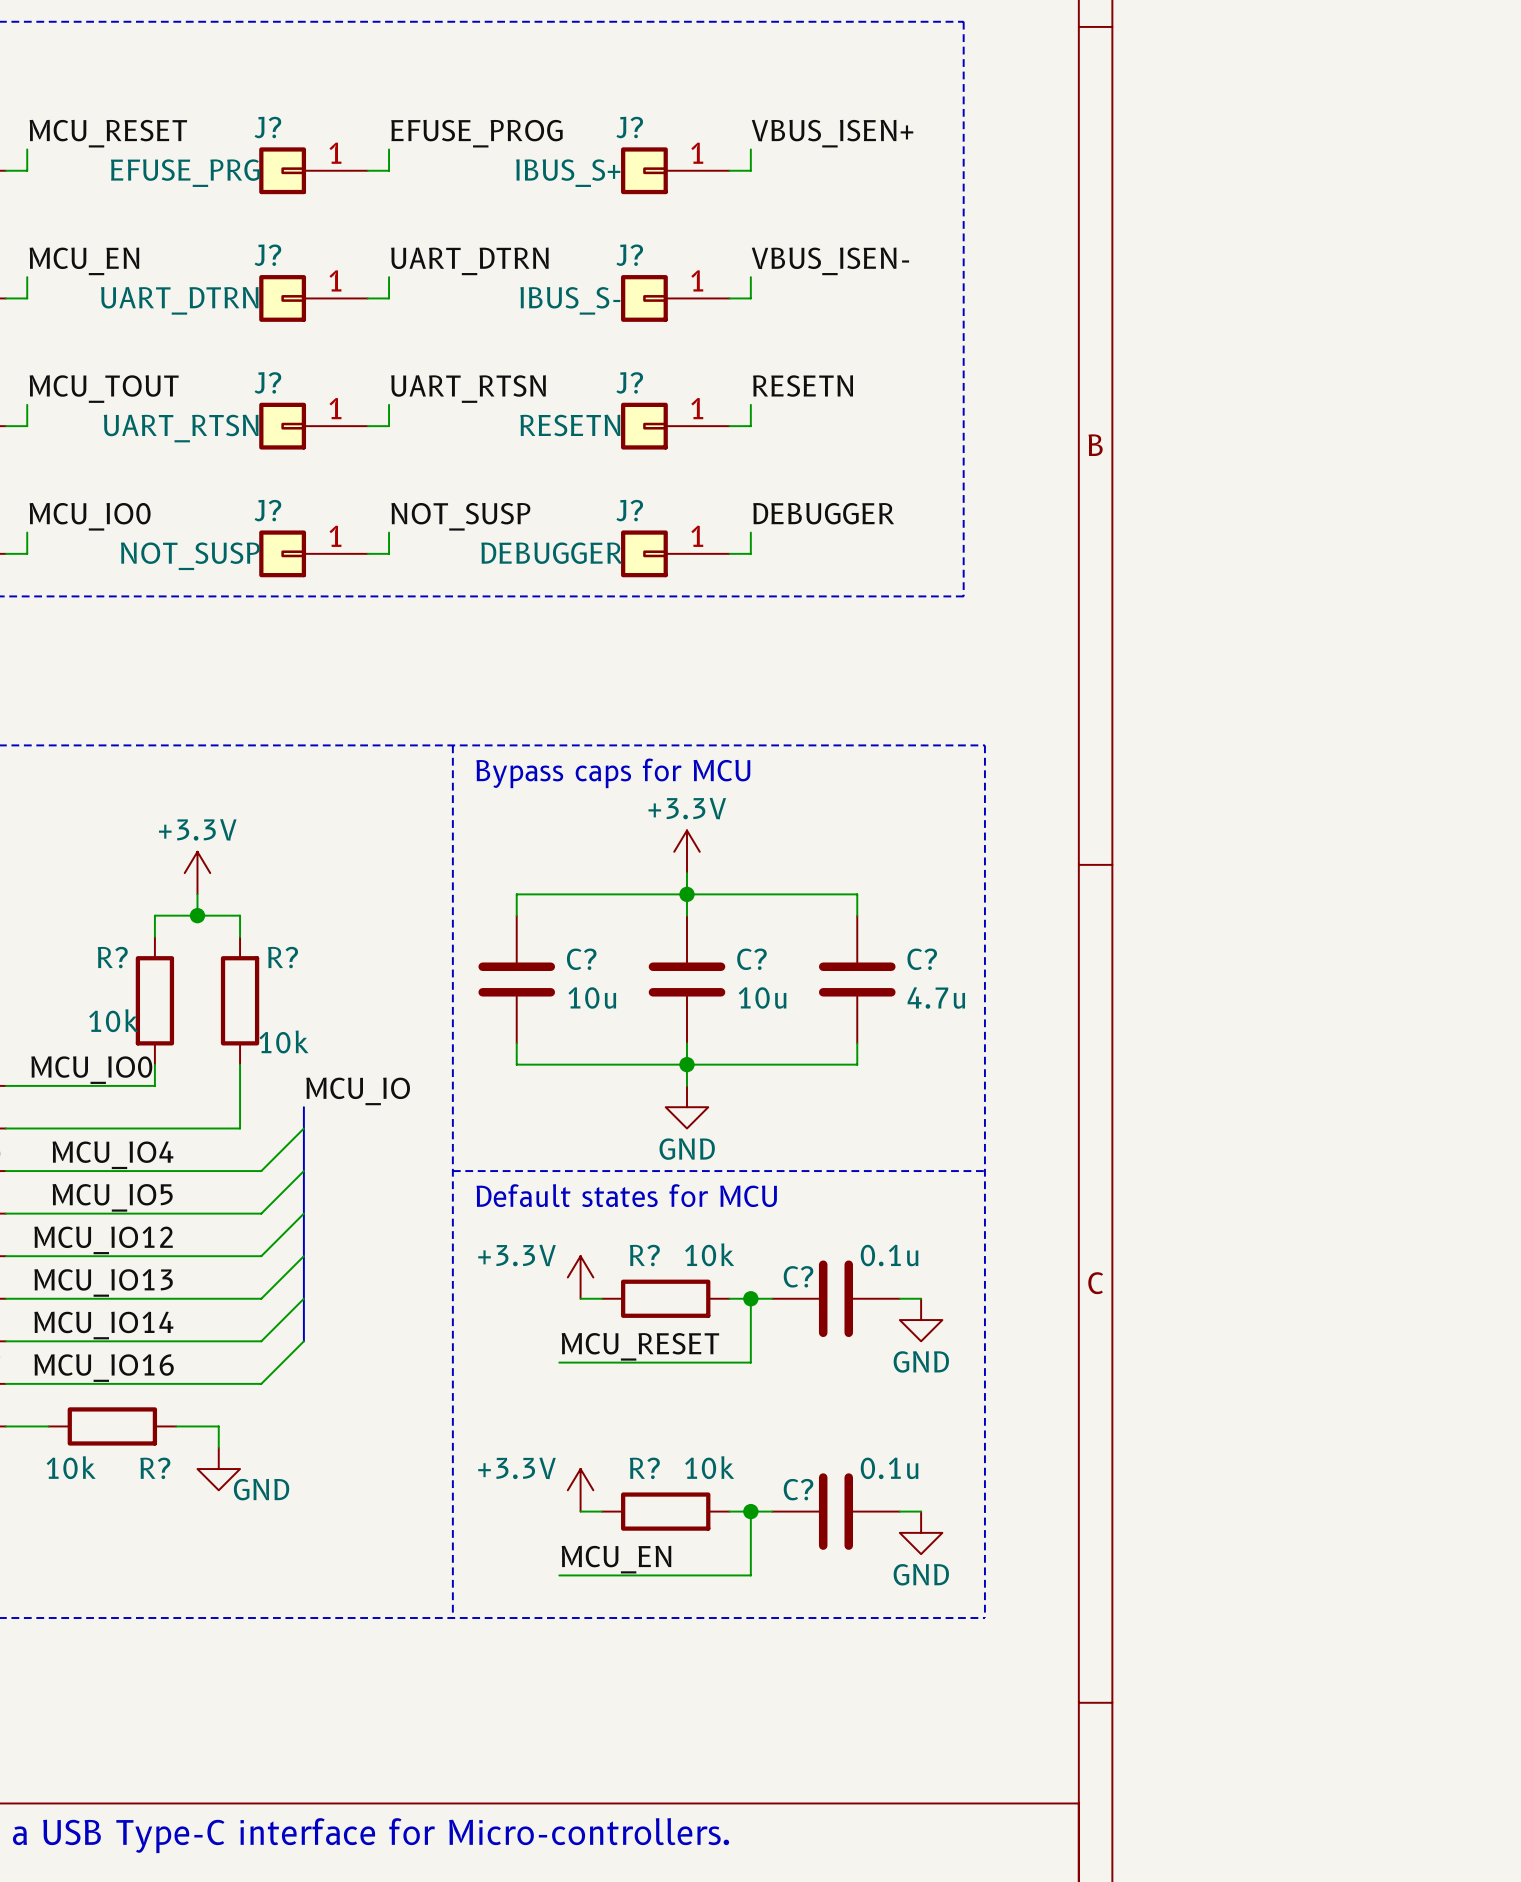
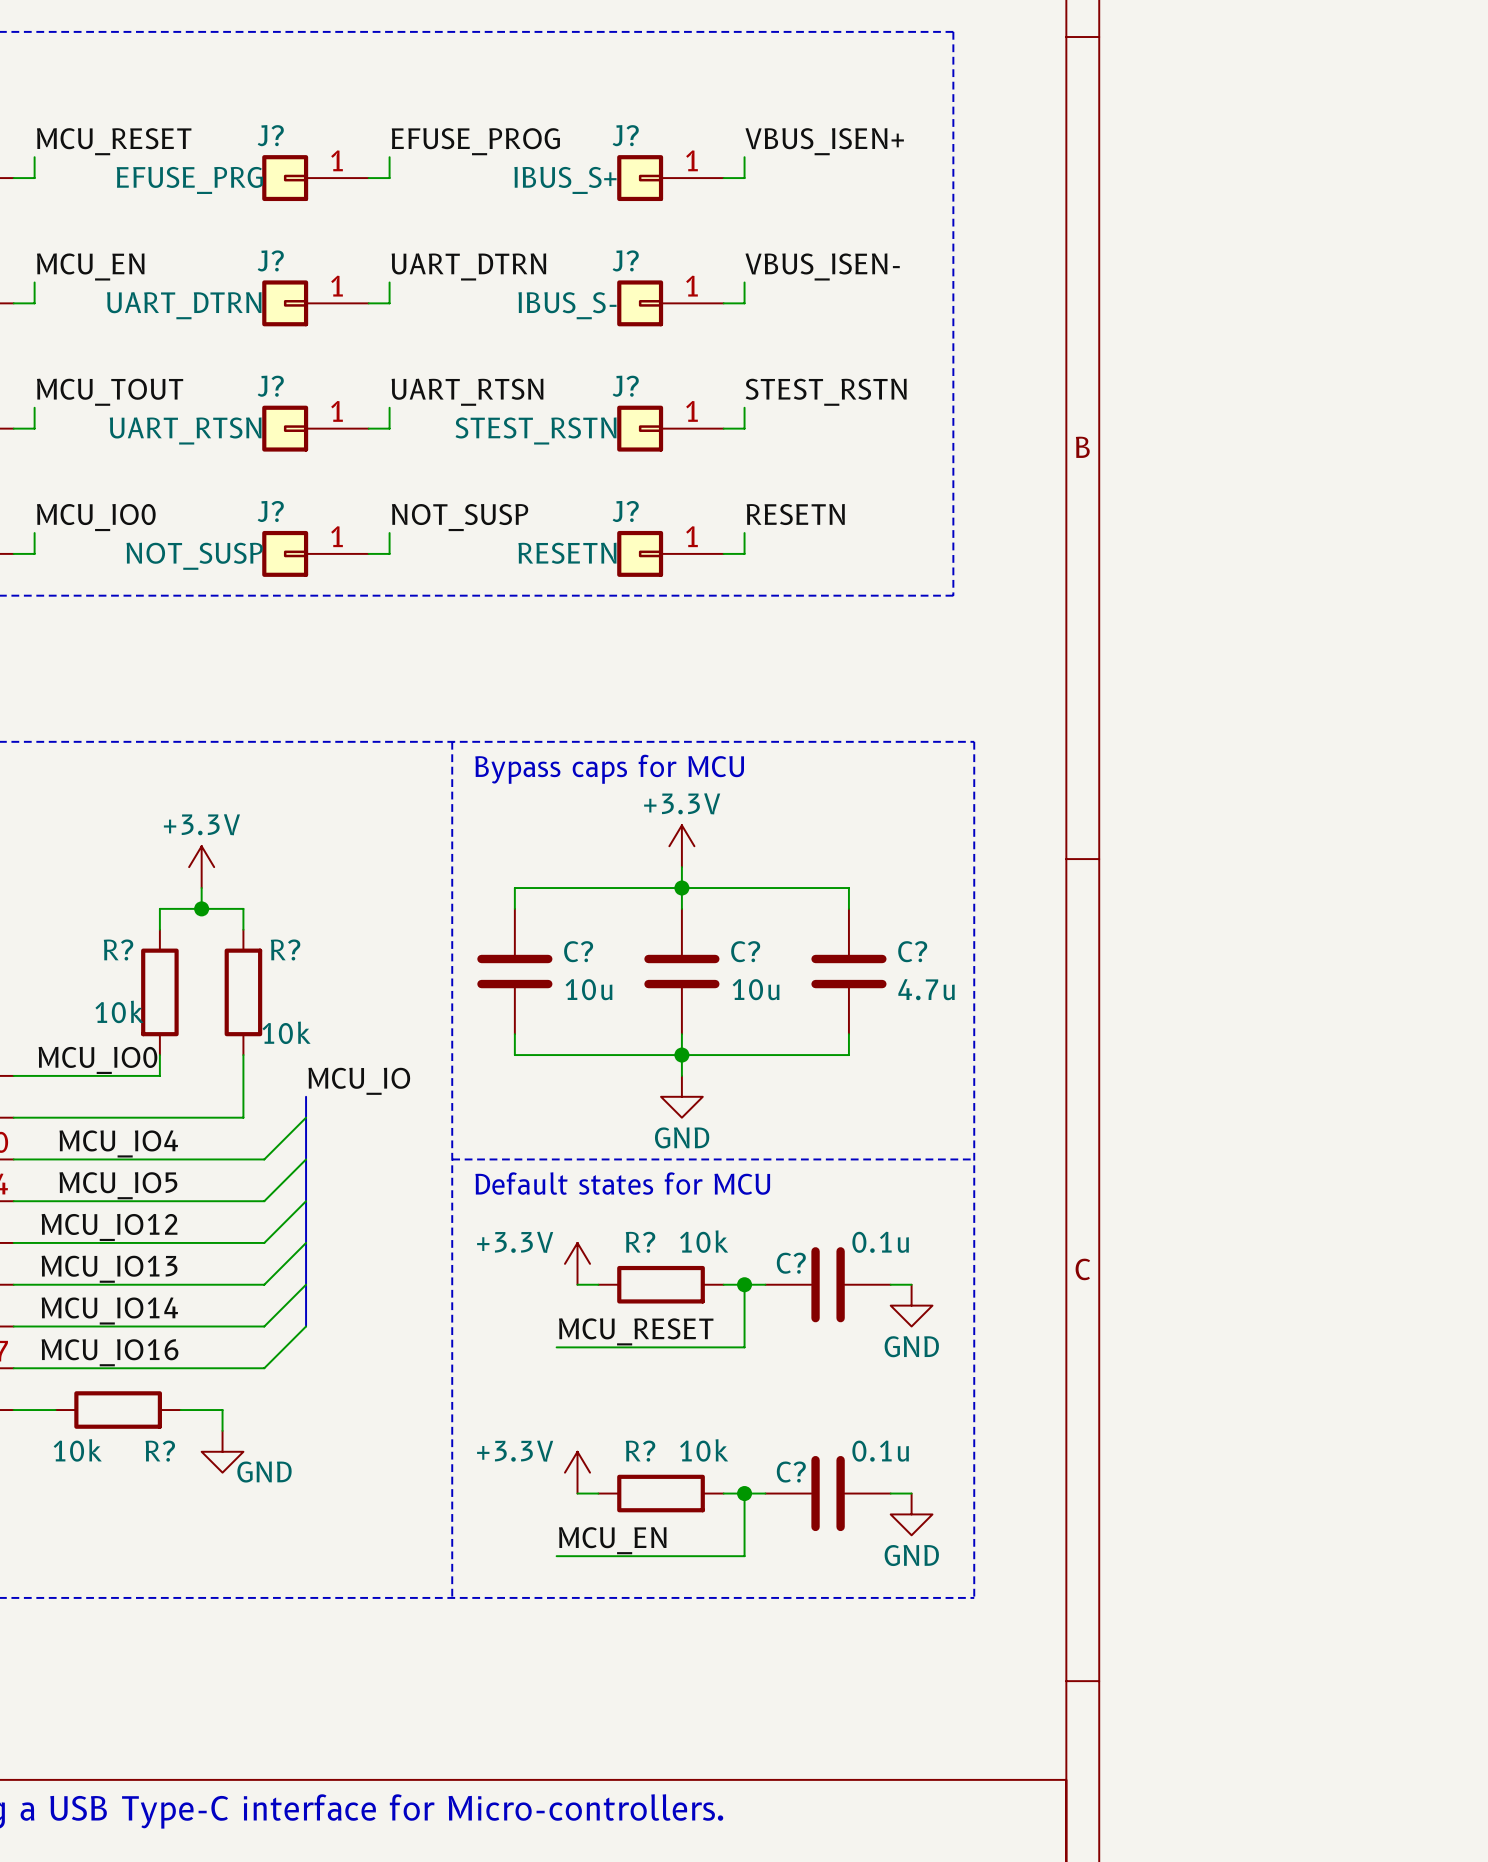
label: RESETN (803, 385) -> STEST_RSTN (826, 392)
J? value: RESETN (570, 425) -> STEST_RSTN (536, 430)
label: DEBUGGER (823, 513) -> RESETN (795, 514)
J? value: DEBUGGER (551, 553) -> RESETN (567, 553)

